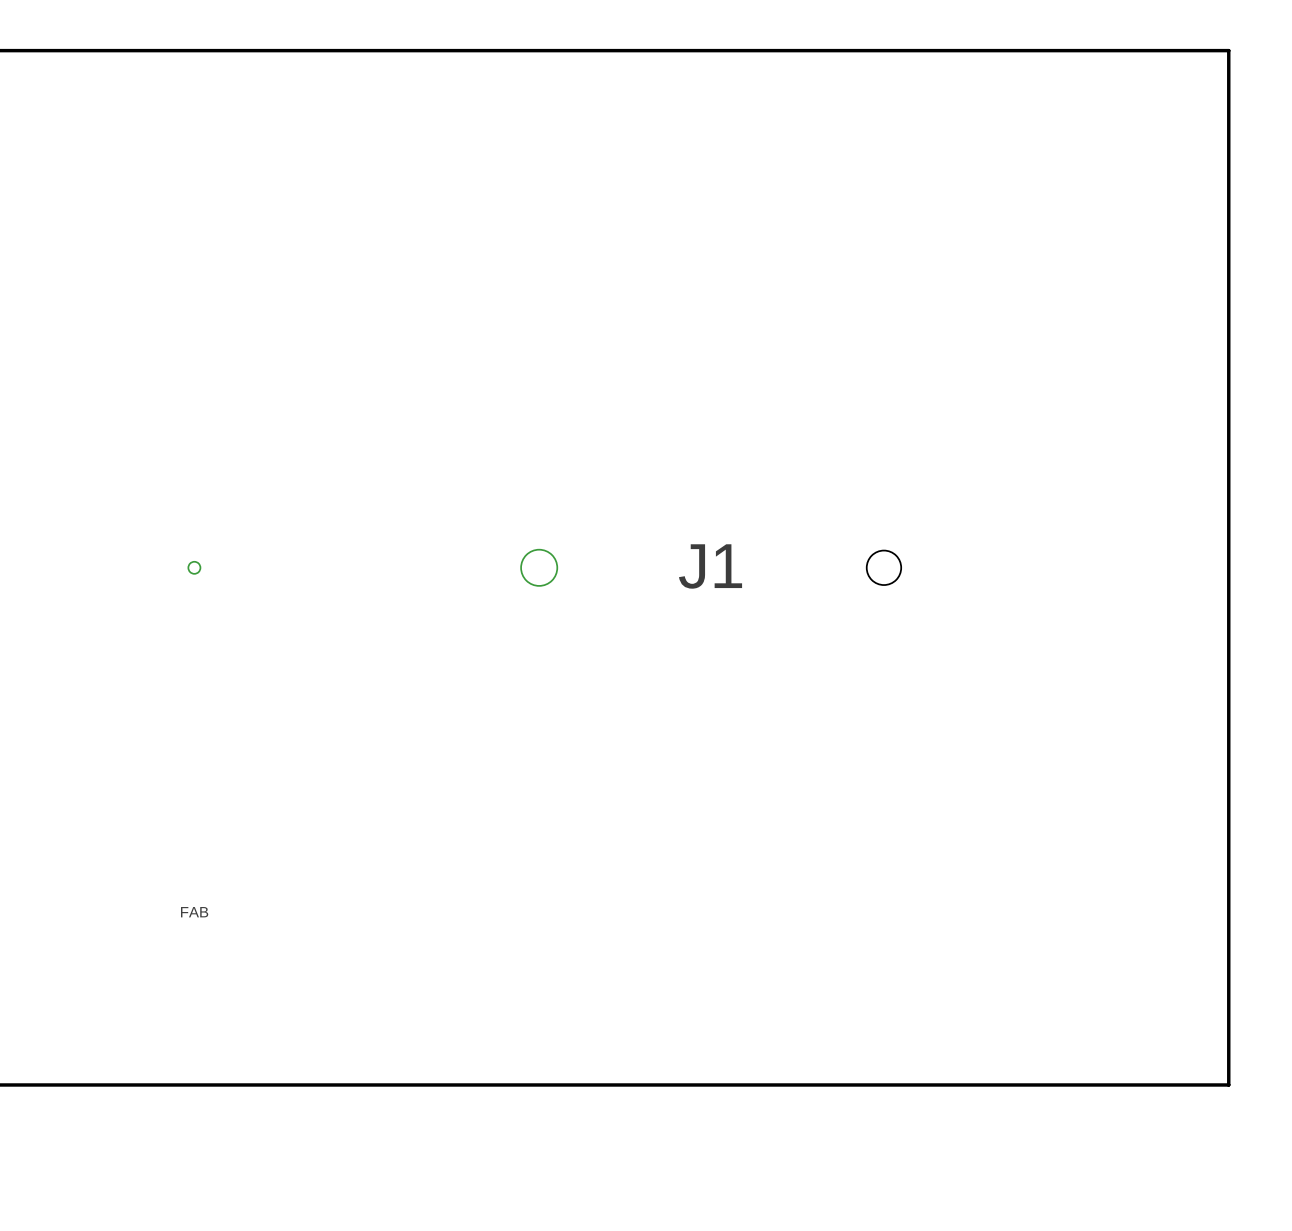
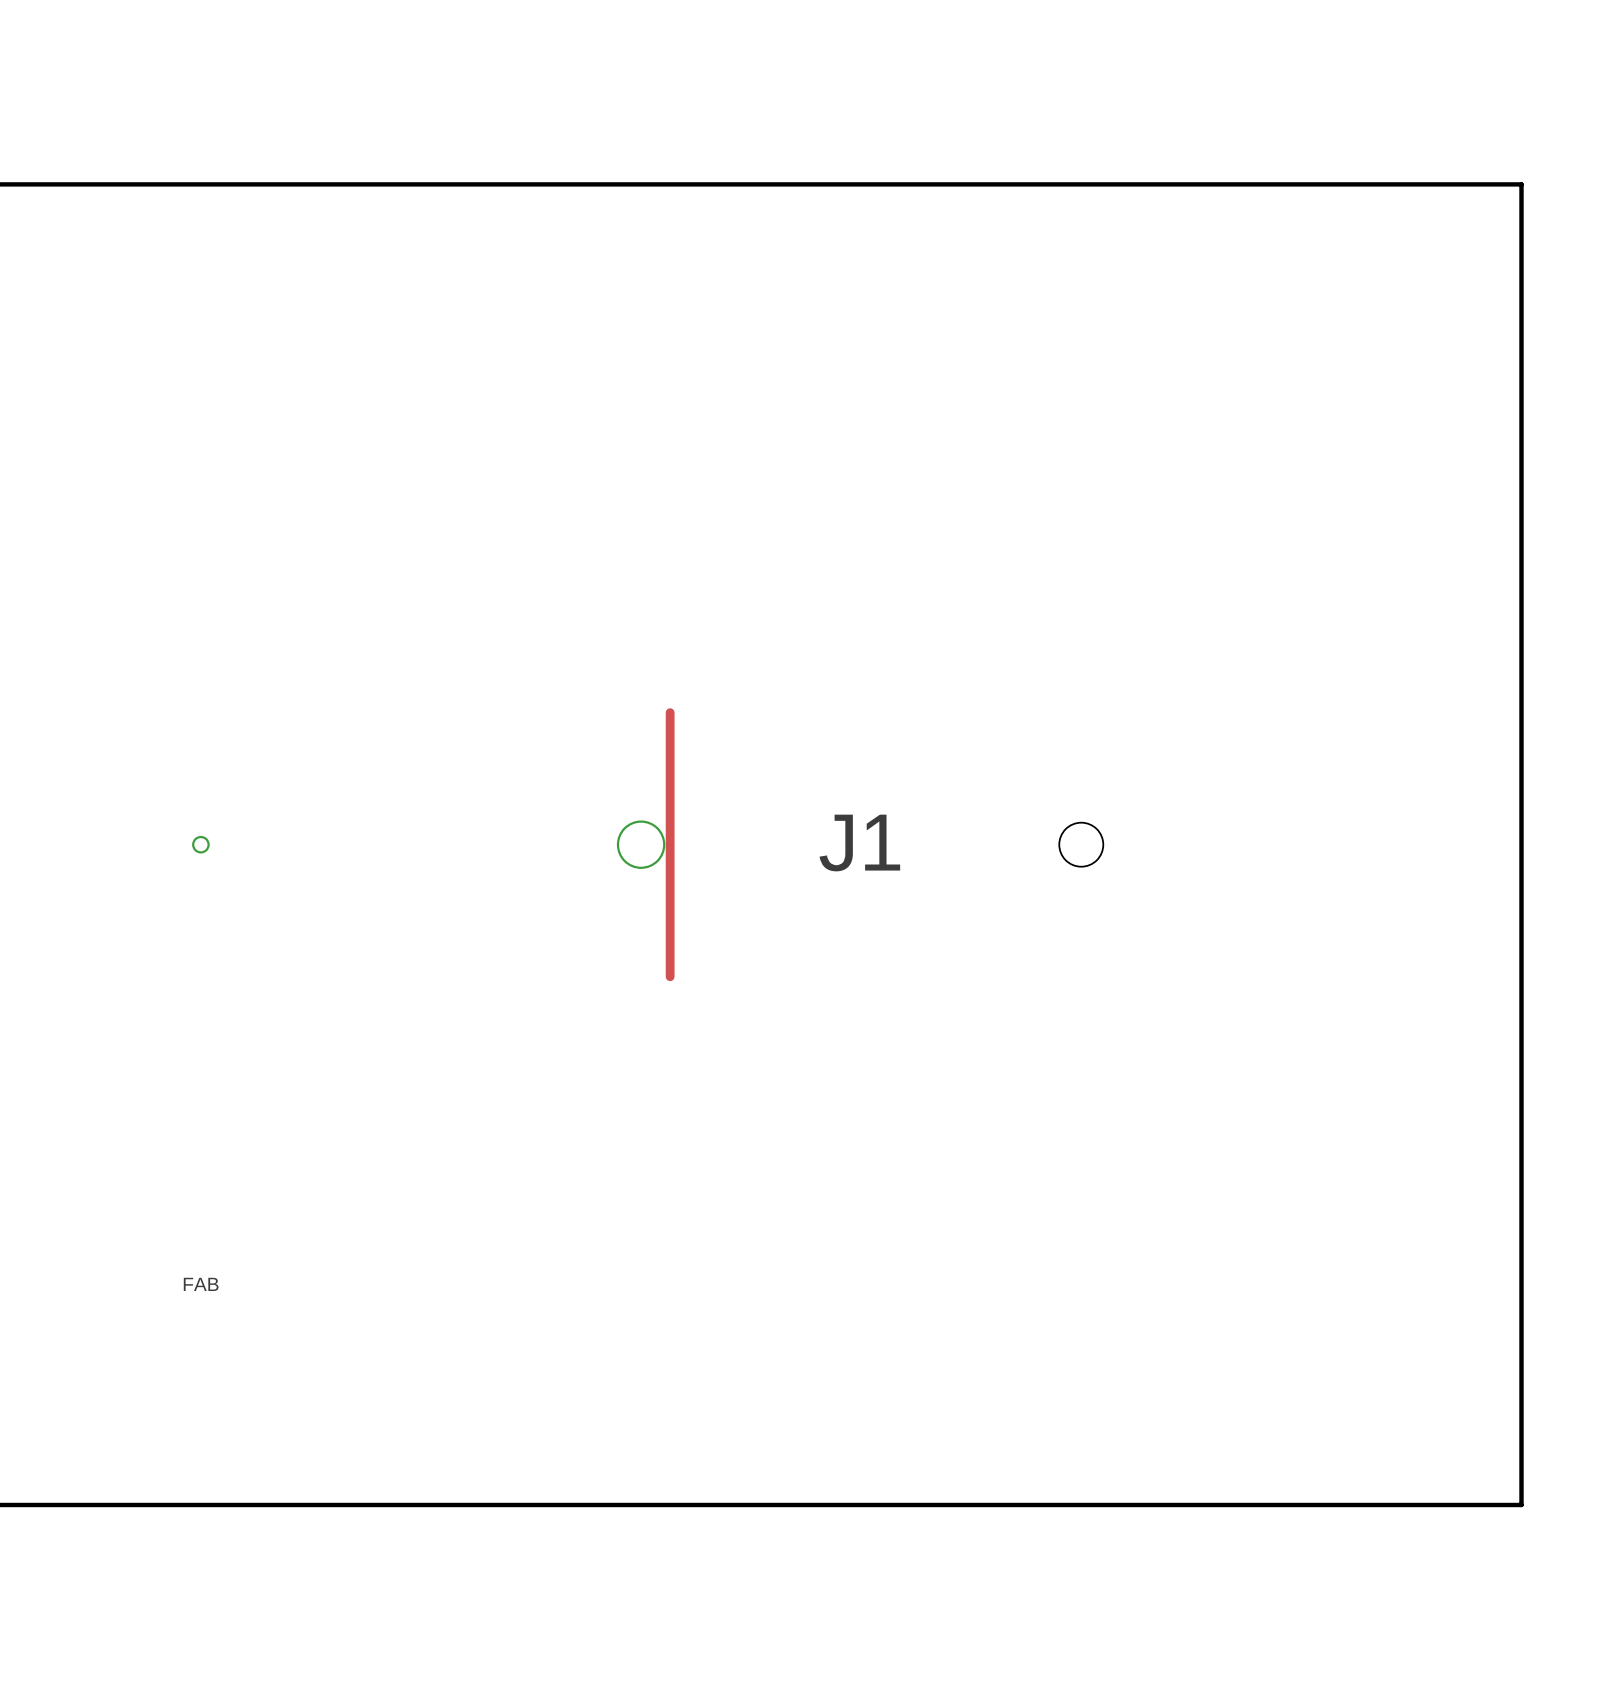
track: none -> (670, 712) (670, 976)

